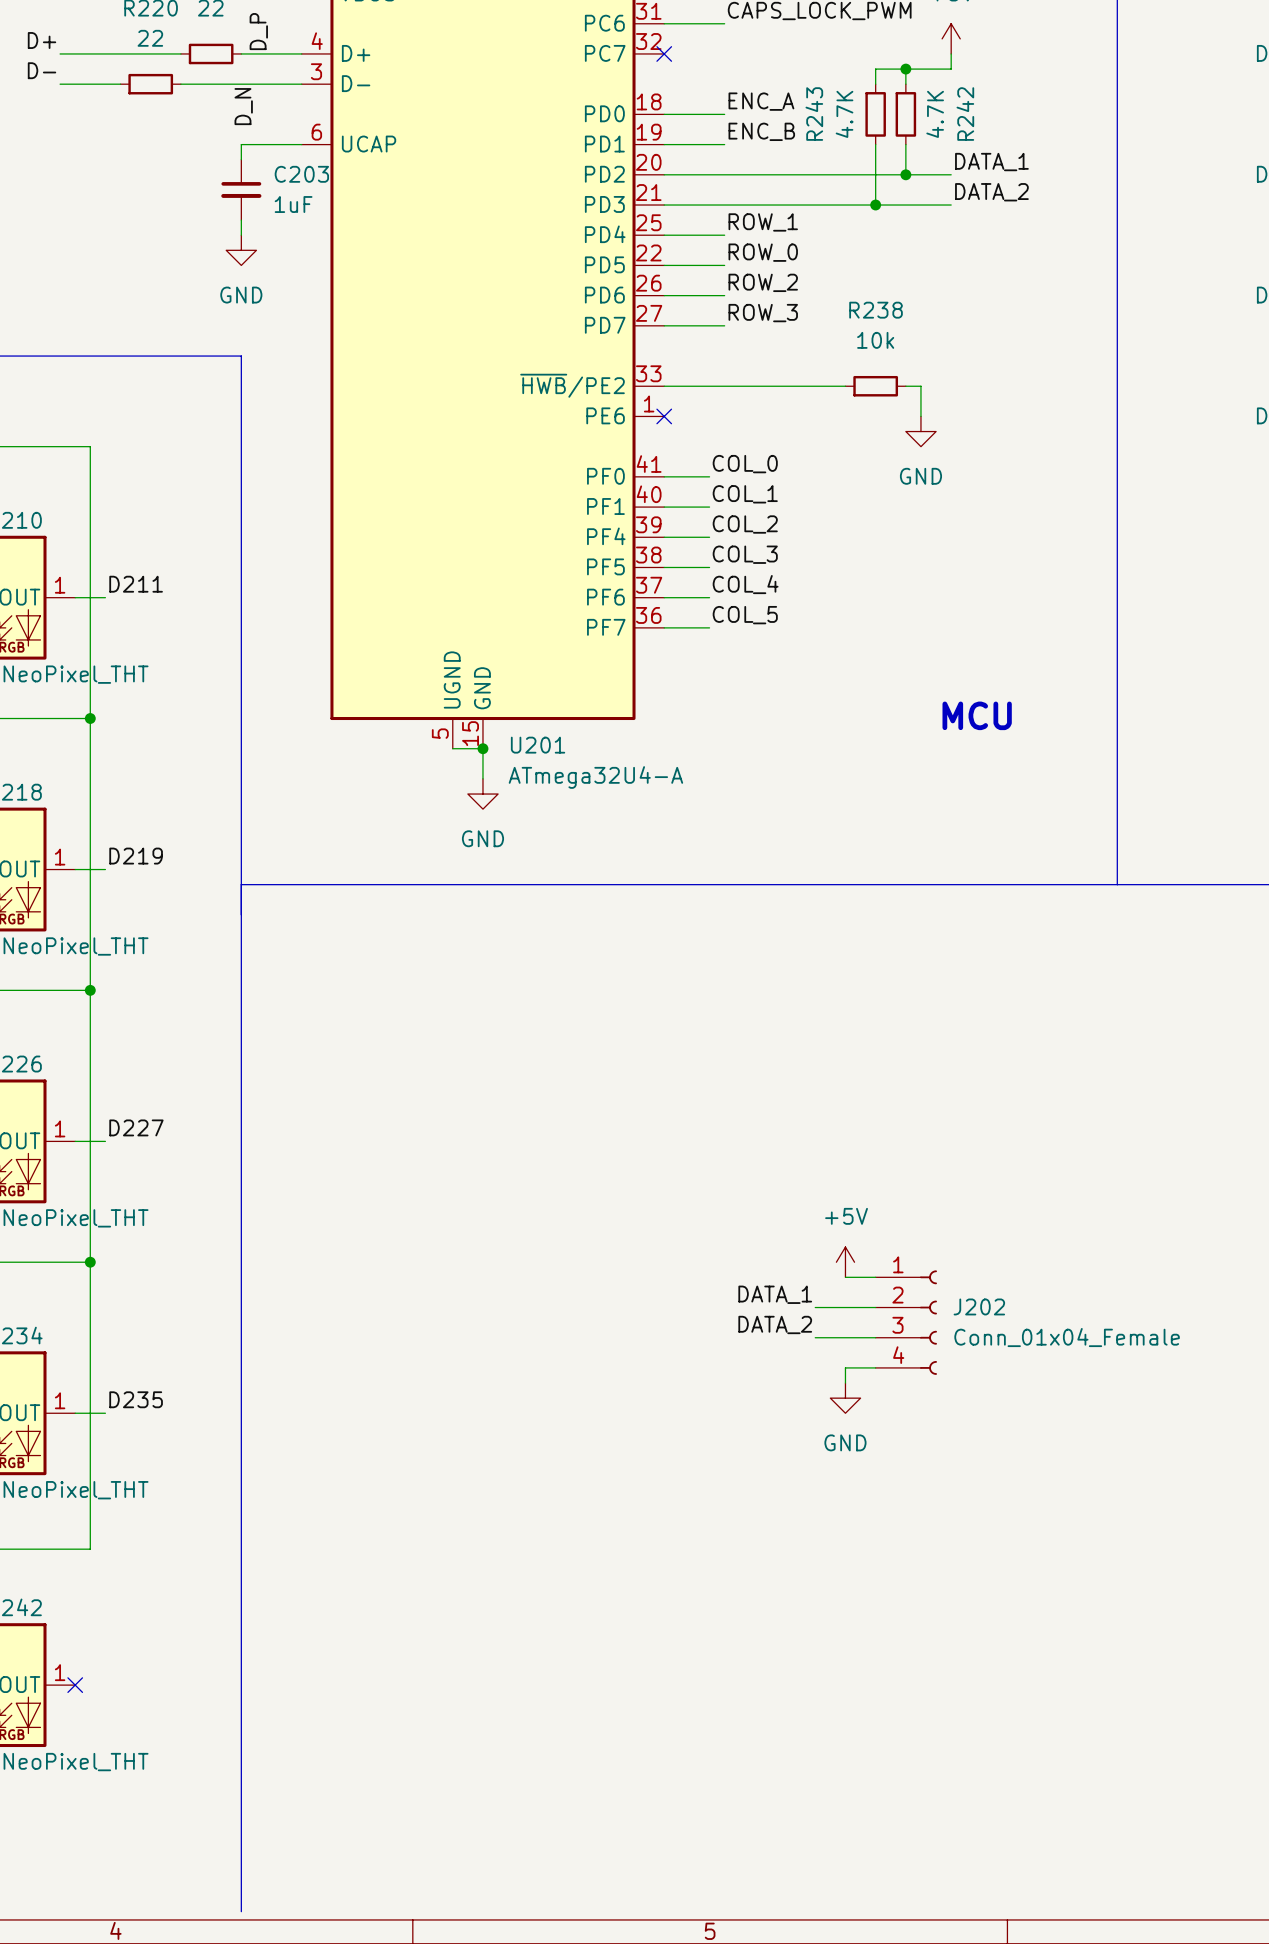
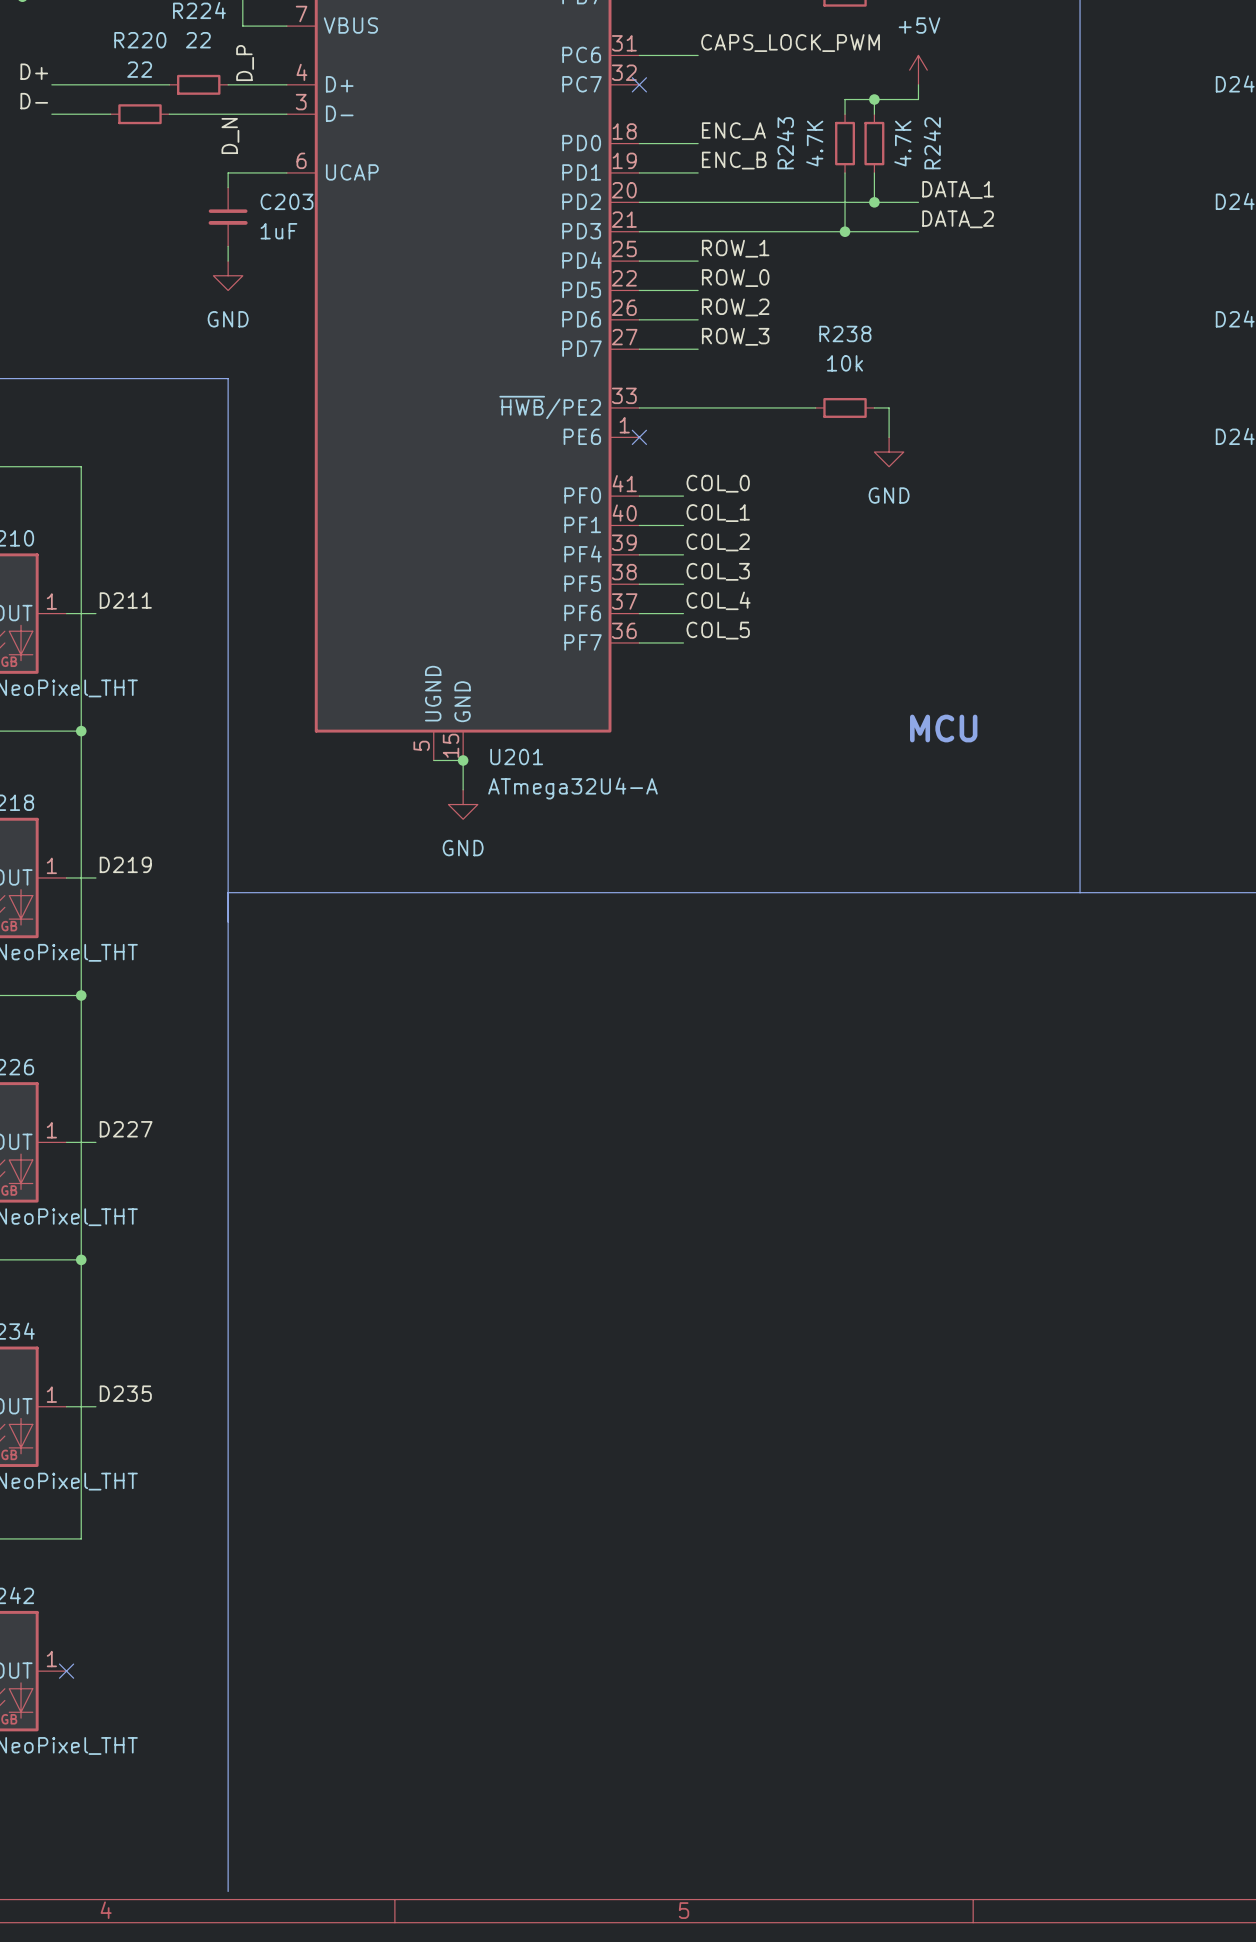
power symbol: +5V (845, 1262) -> none
wire: (845, 1277) (875, 1277) -> none
label: DATA_1 (775, 1294) -> none
wire: (815, 1307) (875, 1307) -> none
J202: Conn_01x04_Female (906, 1322) -> none
label: DATA_2 (775, 1324) -> none
wire: (815, 1337) (875, 1337) -> none
wire: (875, 1367) (845, 1367) (845, 1383) -> none
power symbol: GND (845, 1398) -> none

